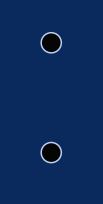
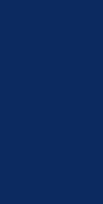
part: (51, 42) -> none
part: (51, 152) -> none

